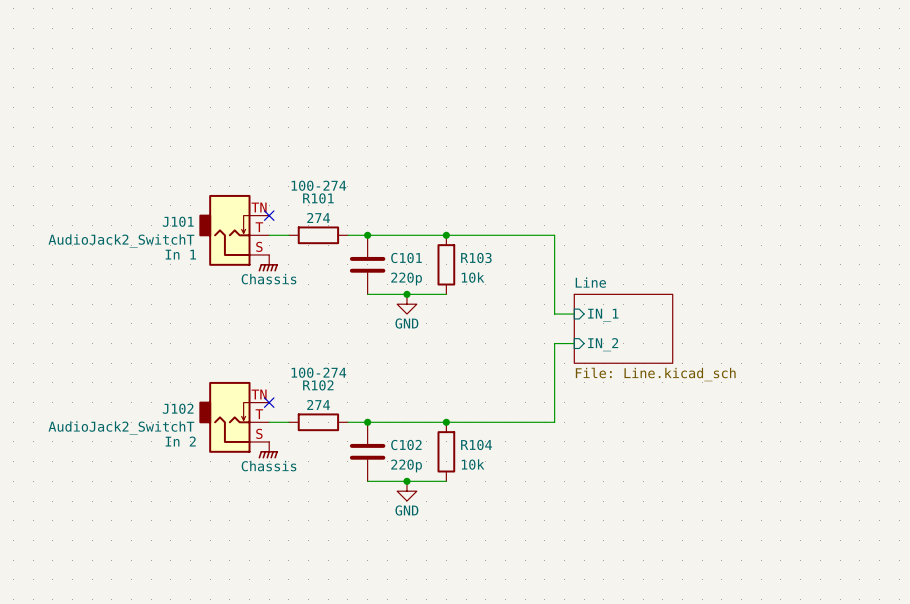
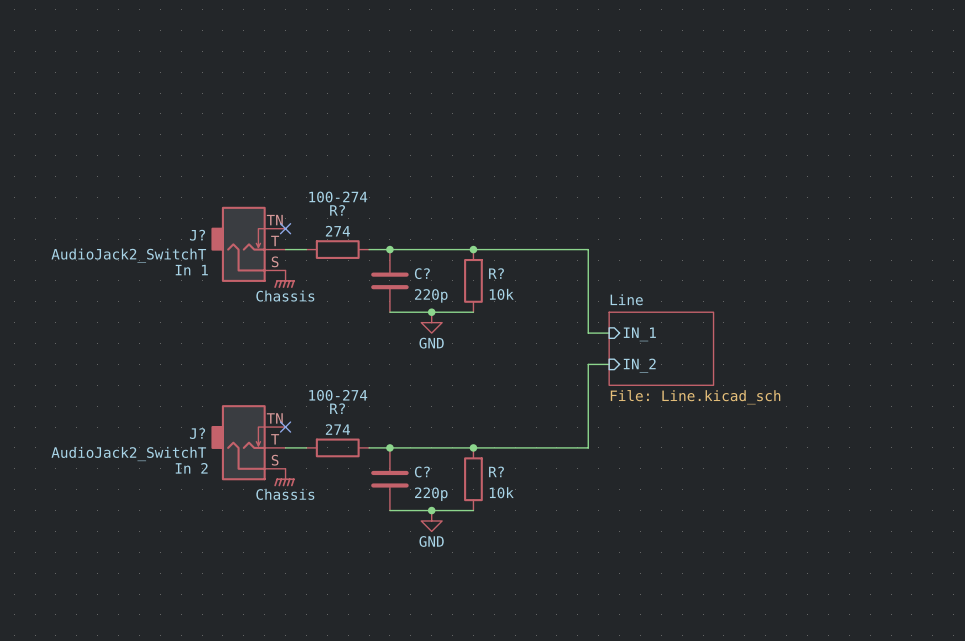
R101 name: R101 (318, 198) -> R? (337, 210)
J101 name: J101 (178, 221) -> J? (197, 235)
C101 name: C101 (406, 258) -> C? (422, 273)
R103 name: R103 (476, 258) -> R? (496, 273)
R102 name: R102 (318, 385) -> R? (337, 408)
J102 name: J102 (178, 408) -> J? (197, 433)
C102 name: C102 (406, 444) -> C? (422, 471)
R104 name: R104 (476, 444) -> R? (496, 471)

